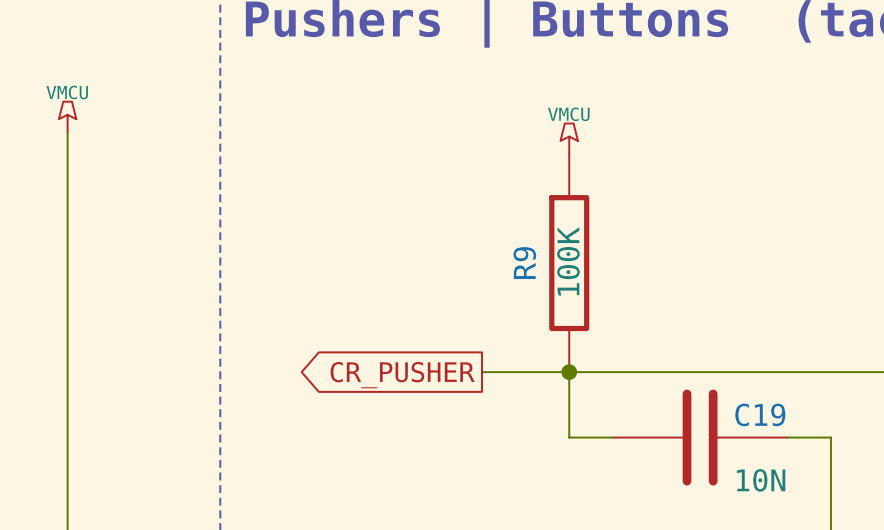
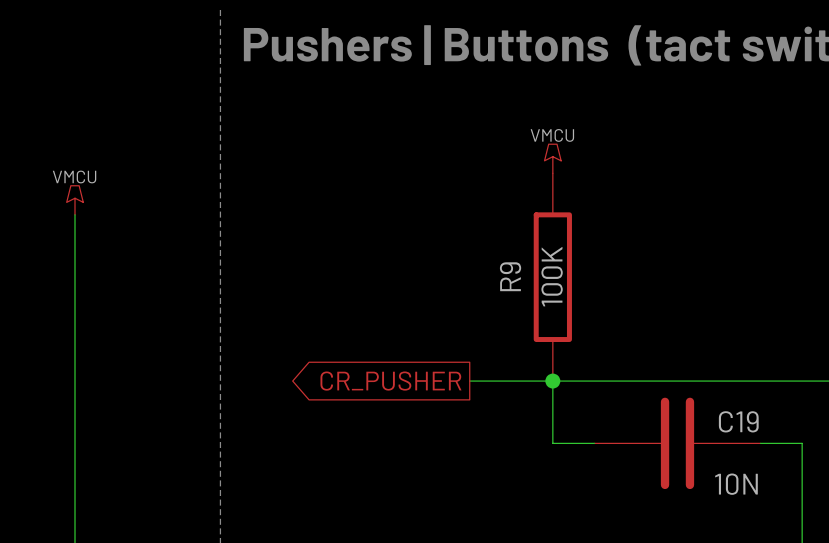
power symbol position: VMCU (67, 116) -> VMCU (75, 200)
wire: (67, 132) (67, 197) -> none

